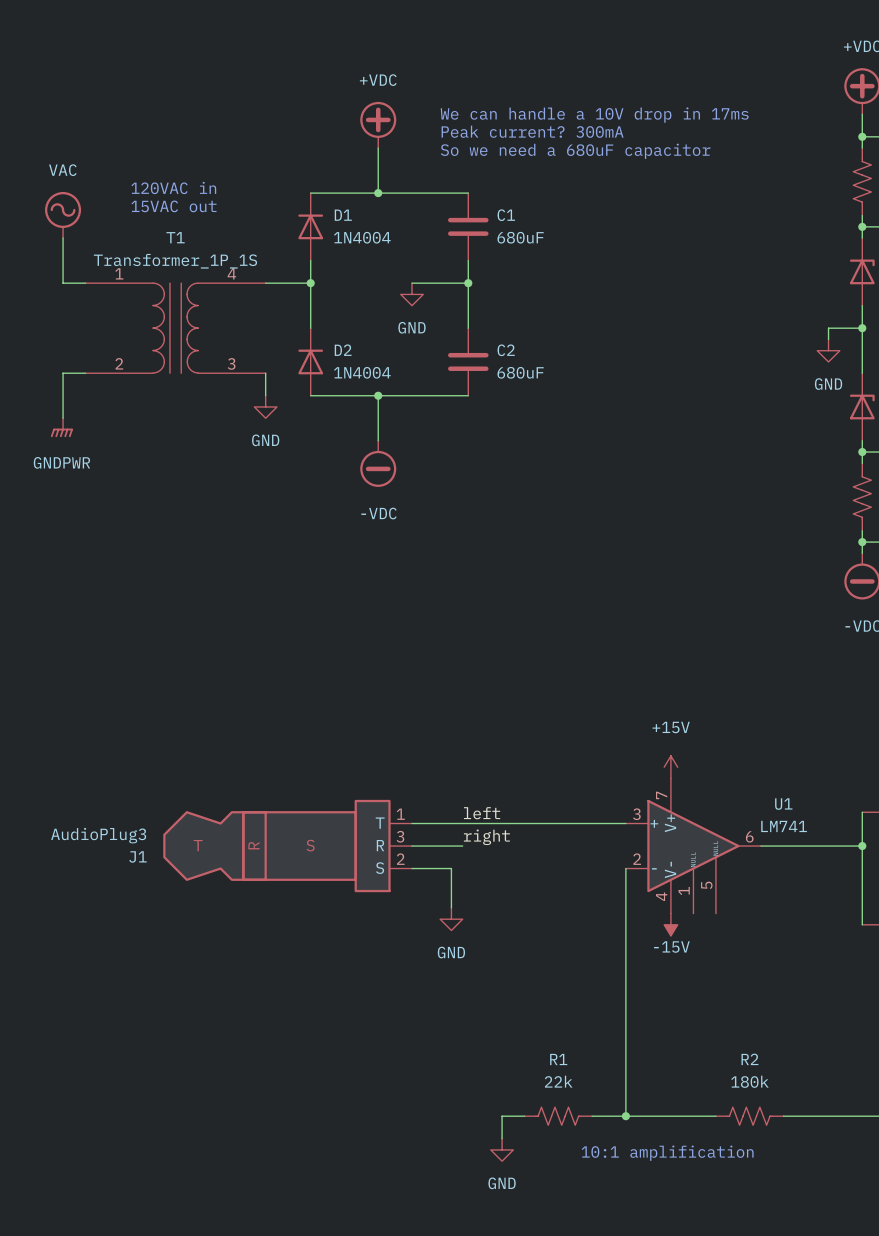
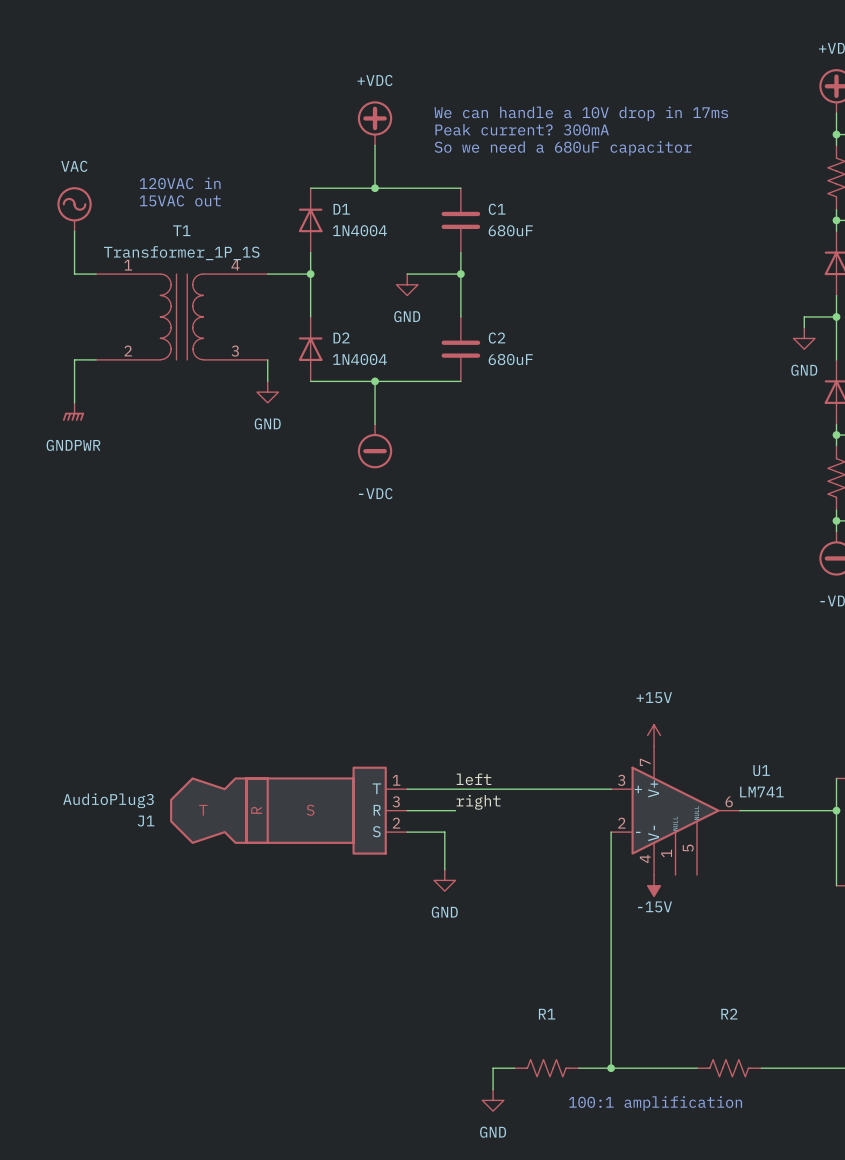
R1 value: 22k (558, 1081) -> none
R2 value: 180k (749, 1081) -> none
text: 10:1 amplification (667, 1153) -> 100:1 amplification (655, 1103)

